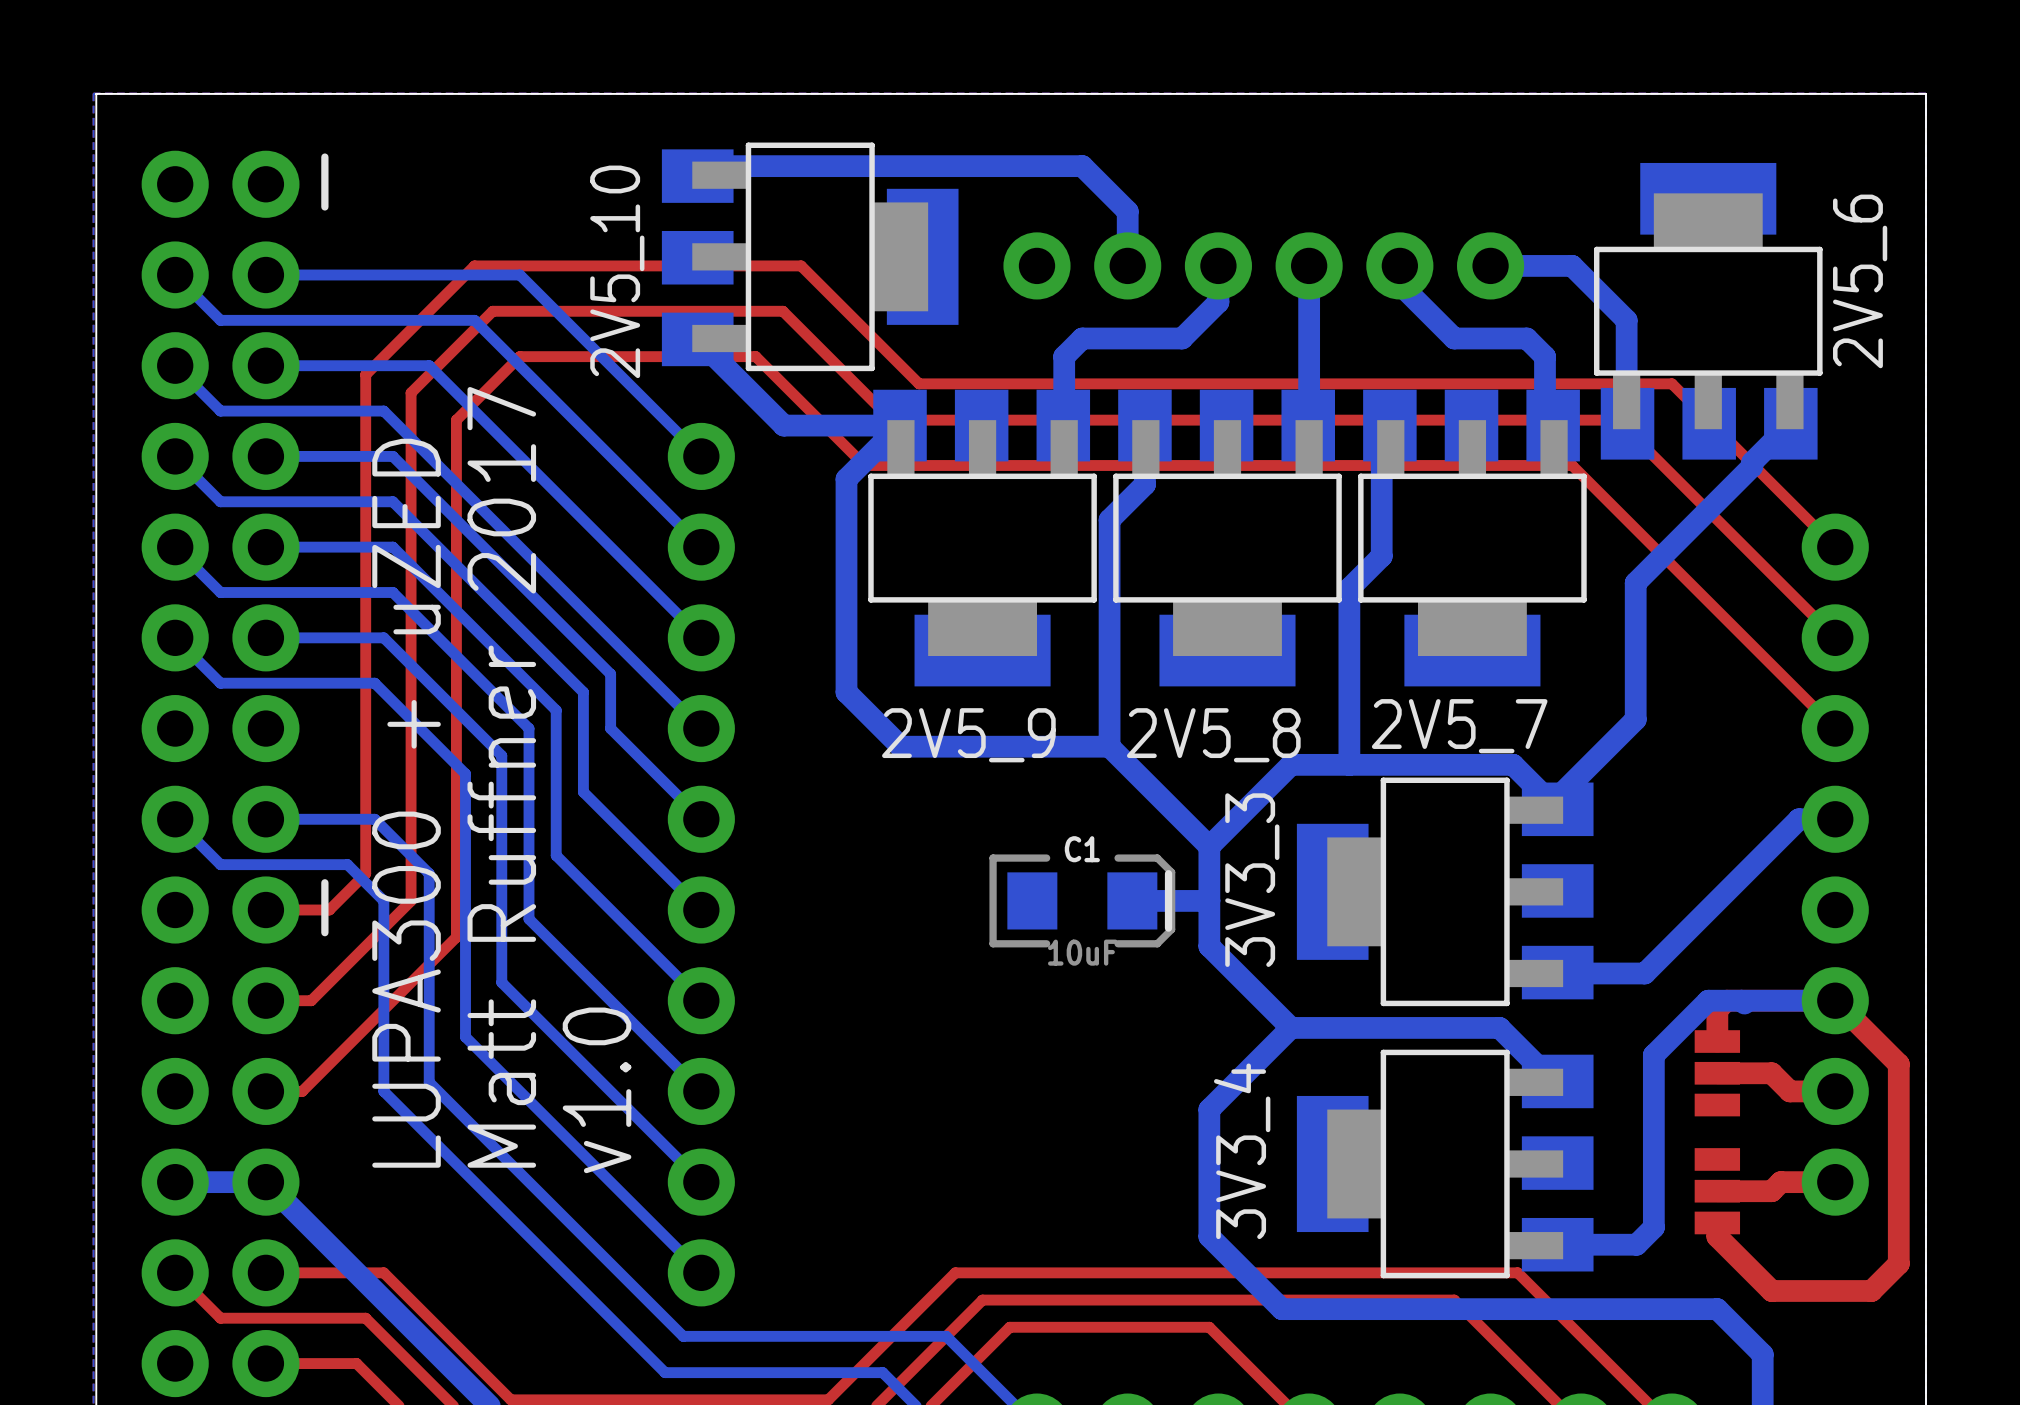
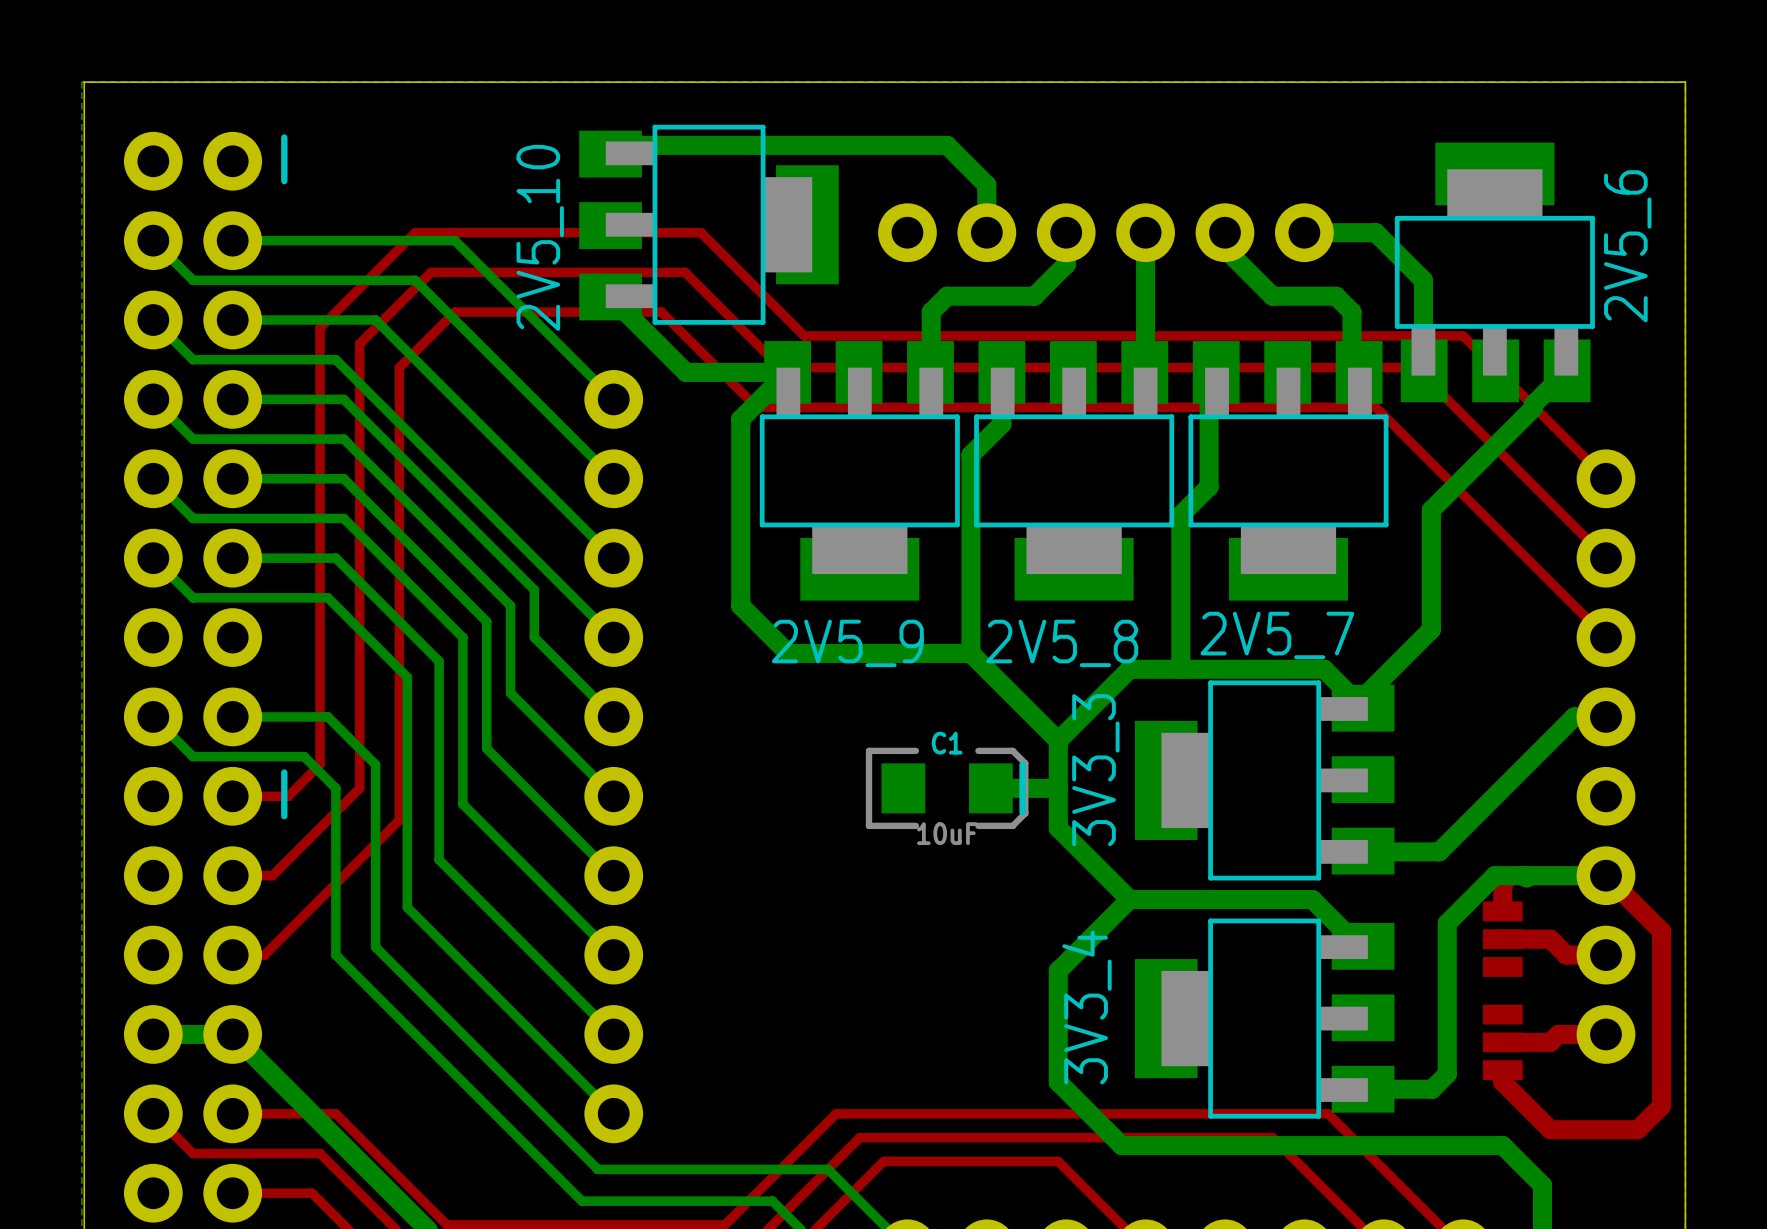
text: Matt Ruffner 2017 (501, 777) -> none
text: LUPA300 + uZED (406, 803) -> none
text: v1.0 (597, 1090) -> none

